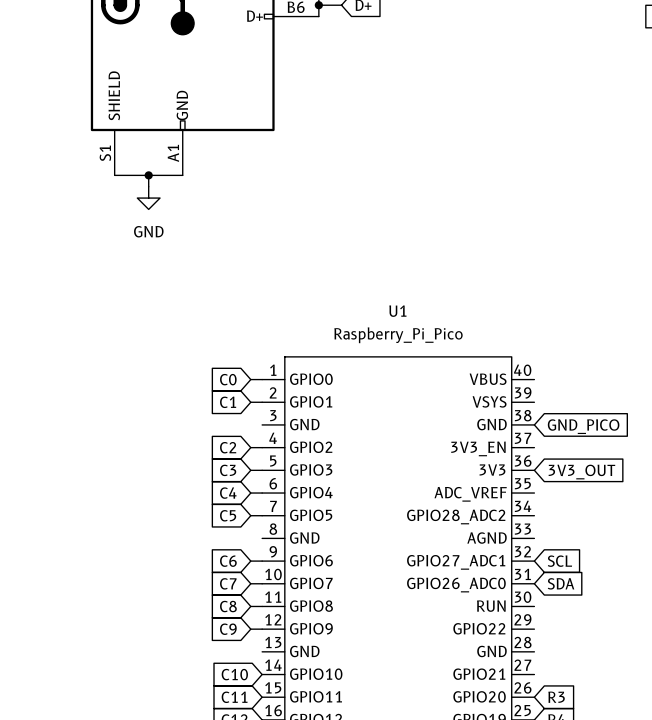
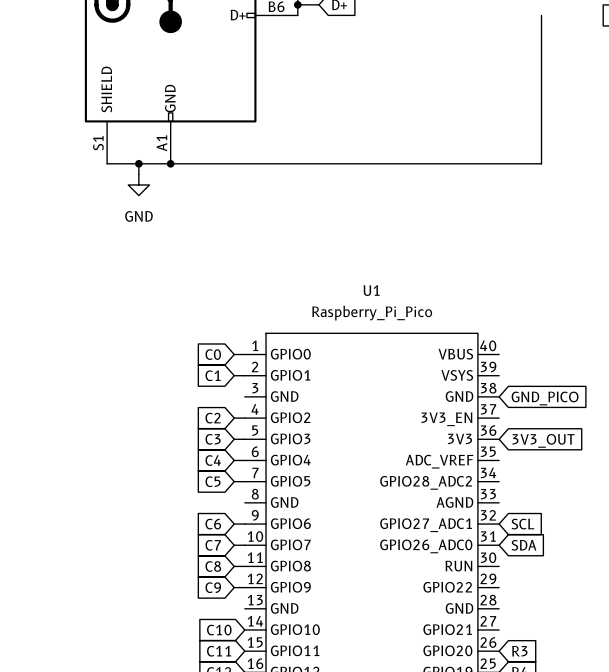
wire: none -> (541, 15) (541, 163) (170, 163)
junction: none -> (170, 163)

